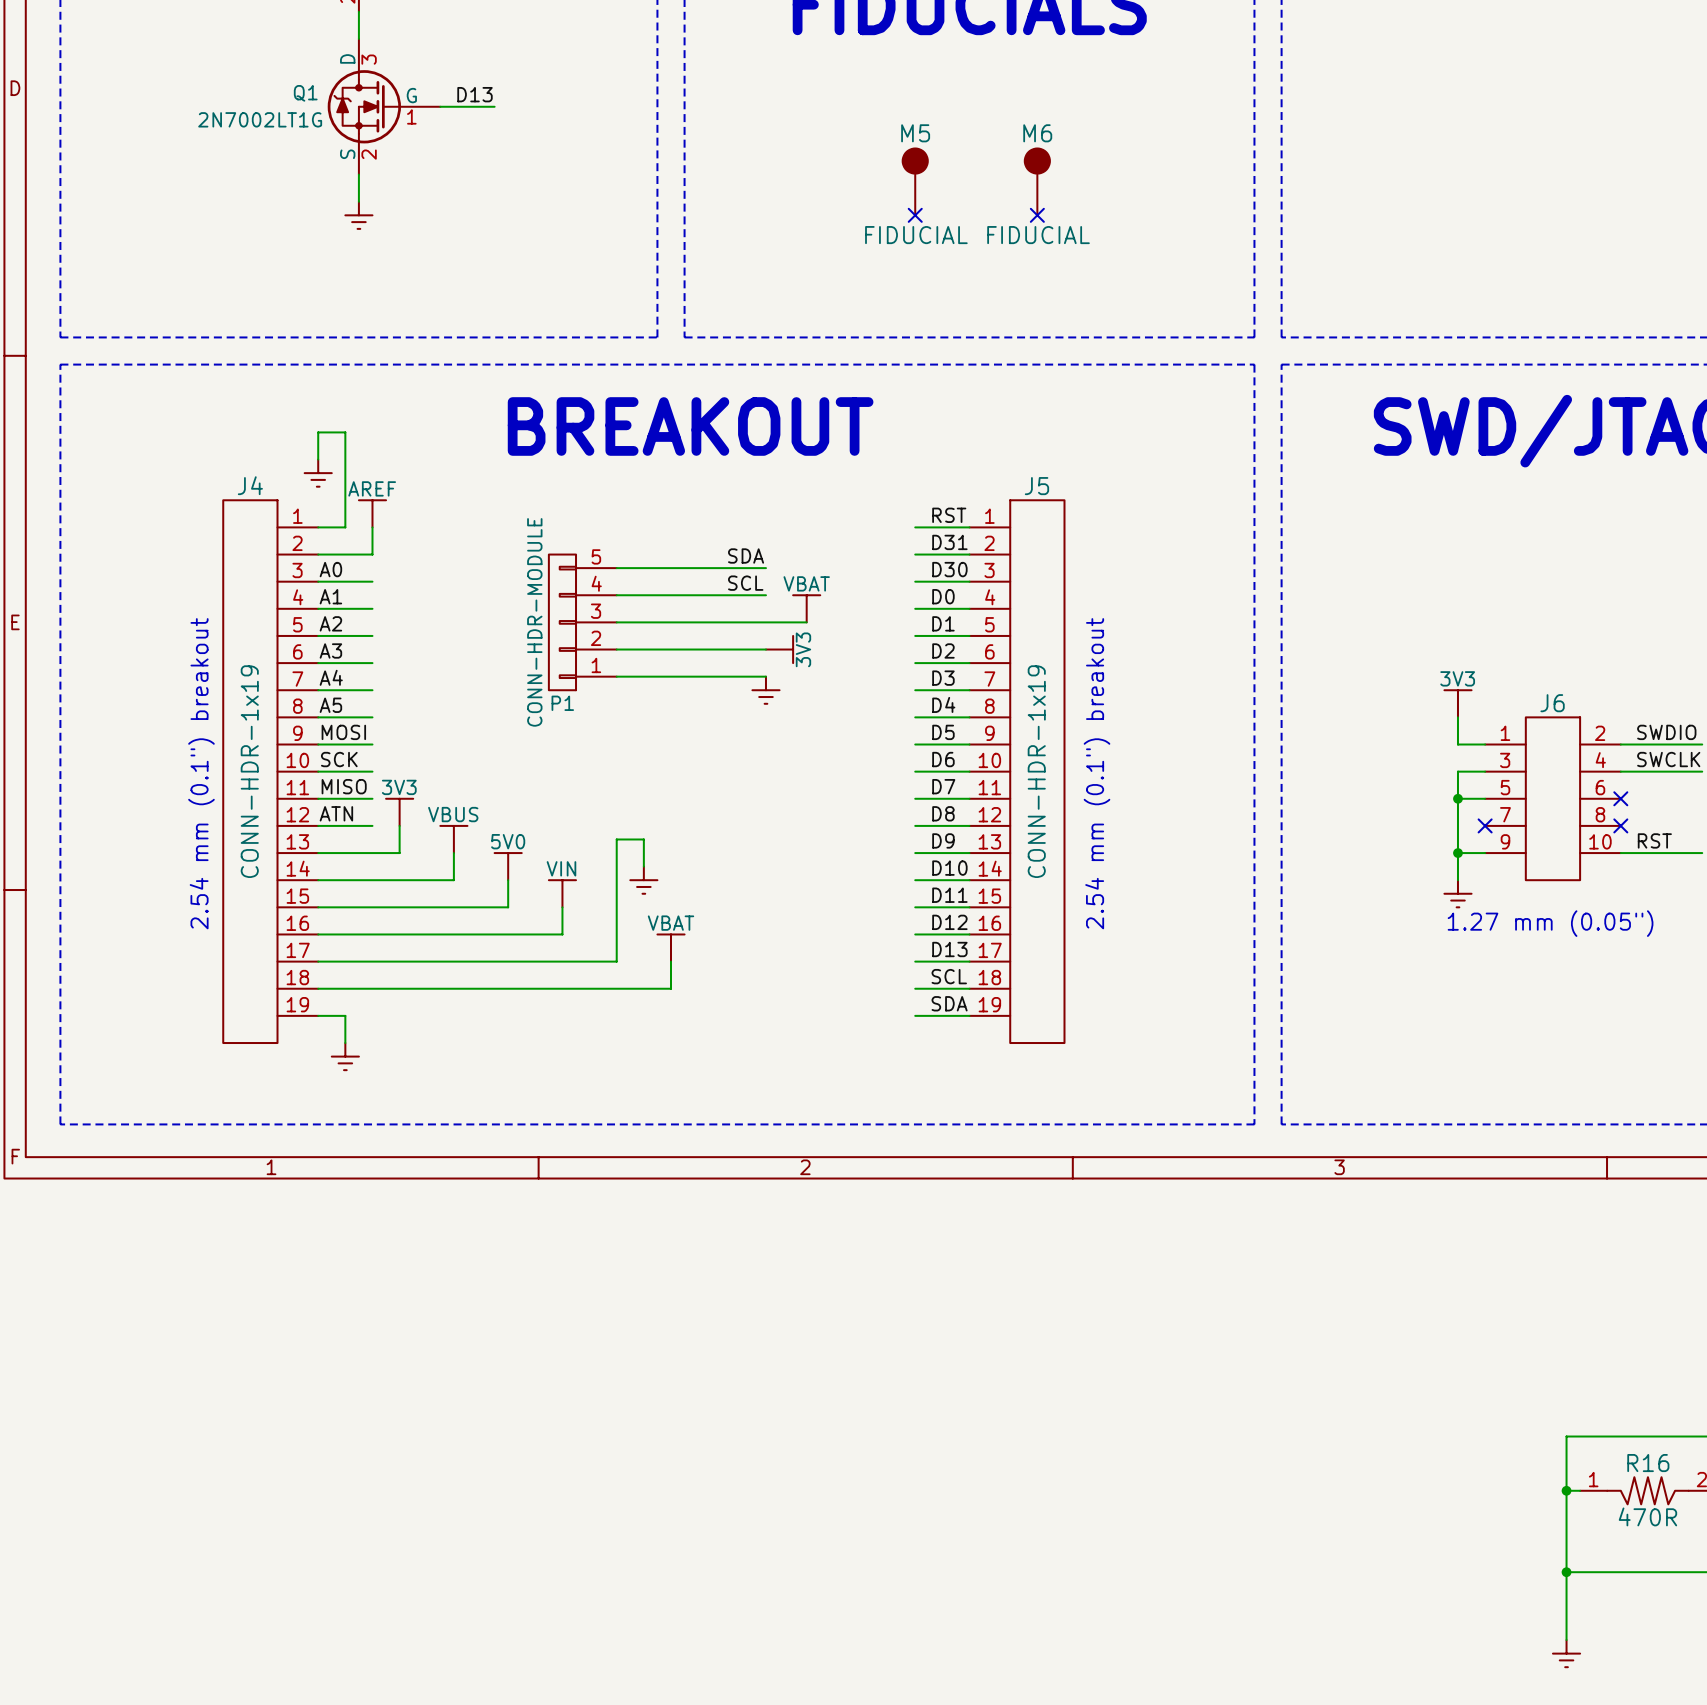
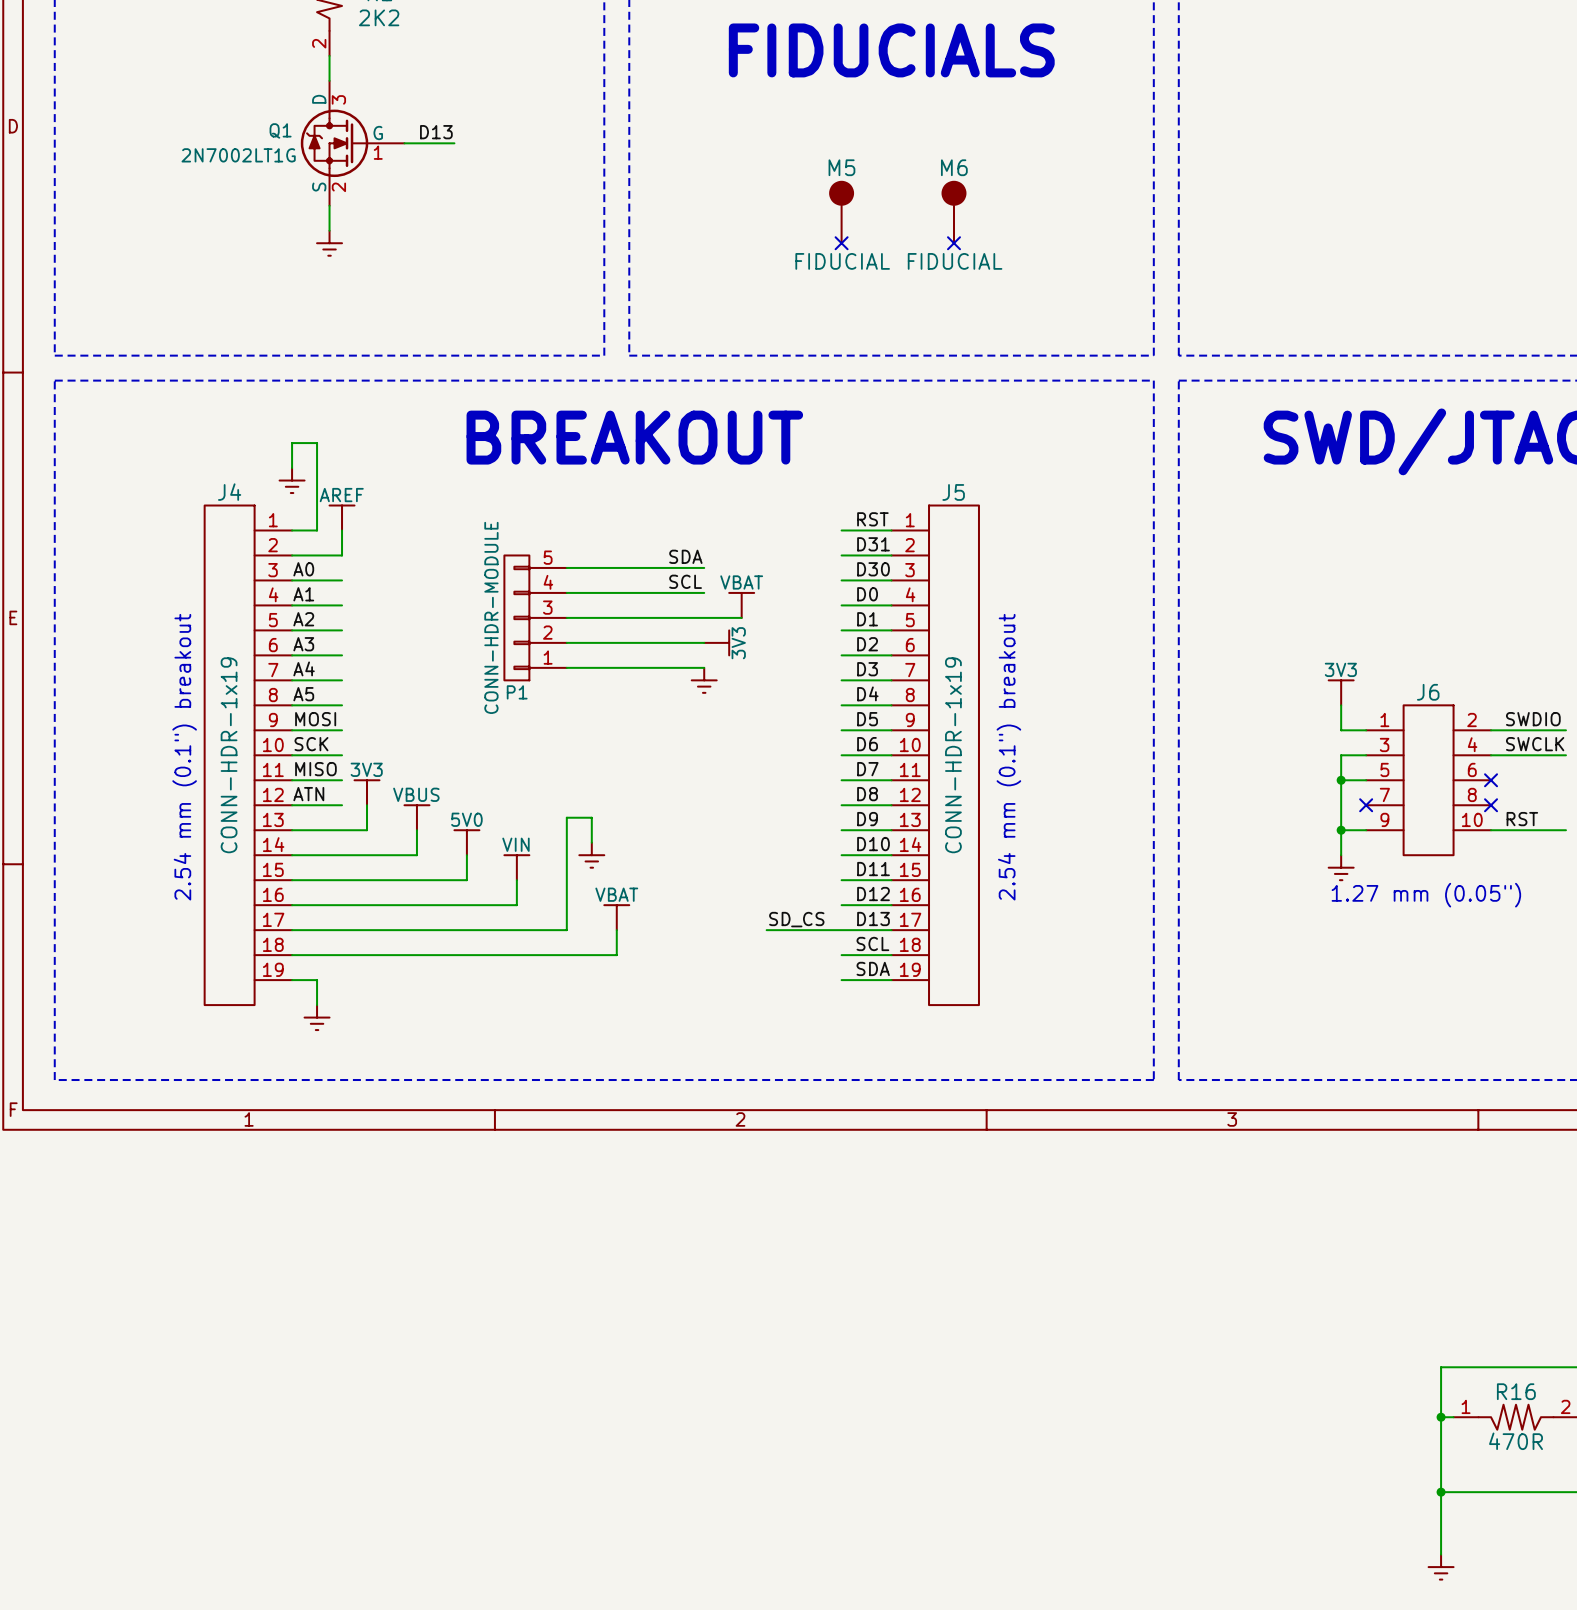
label: none -> SD_CS (796, 919)
wire: none -> (766, 930) (841, 930)

